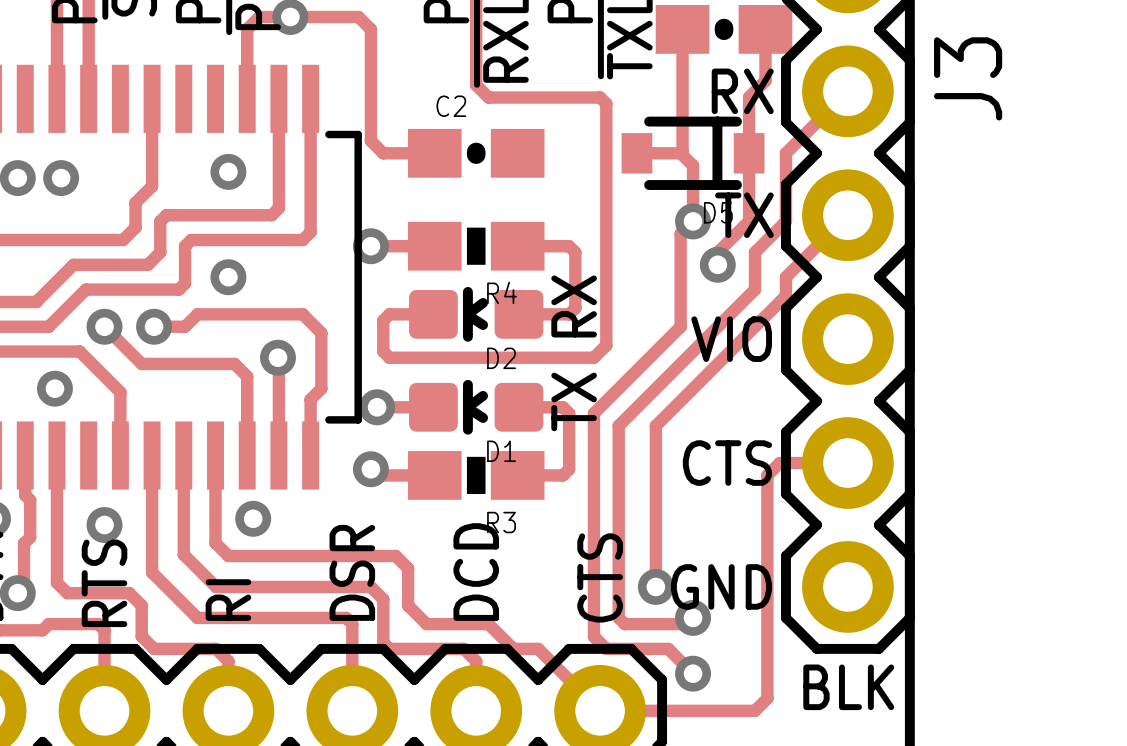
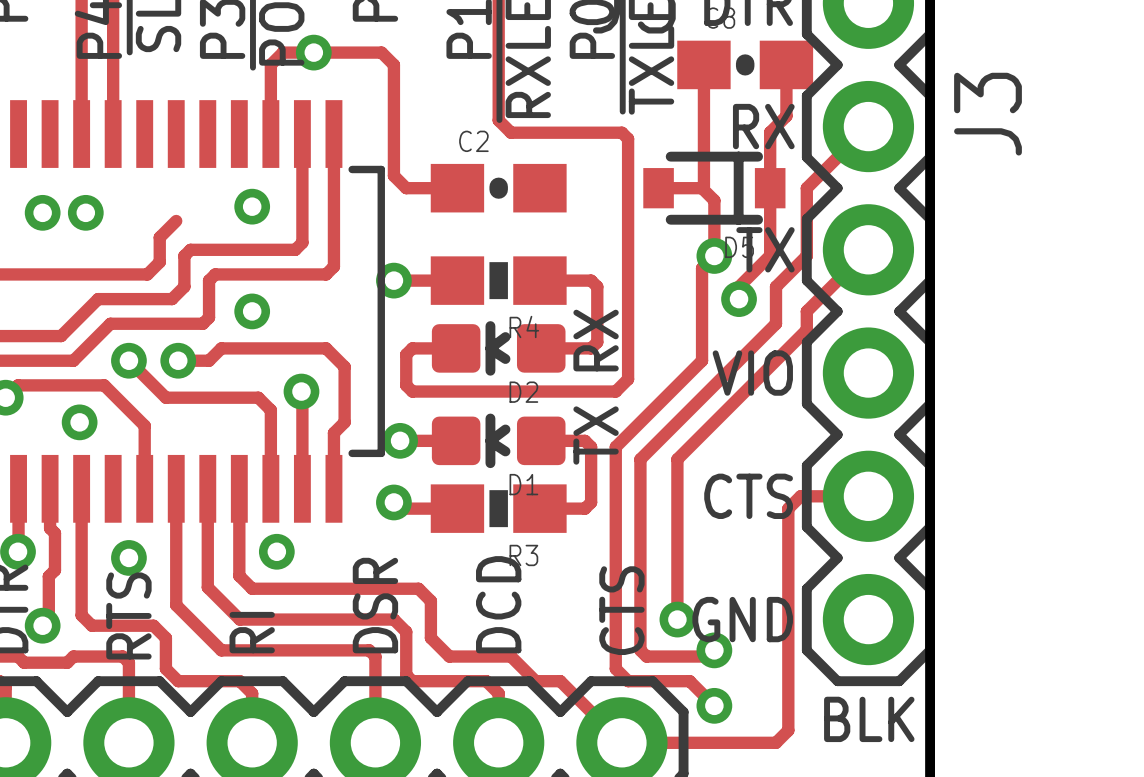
track: (152, 98) (152, 186) -> none

